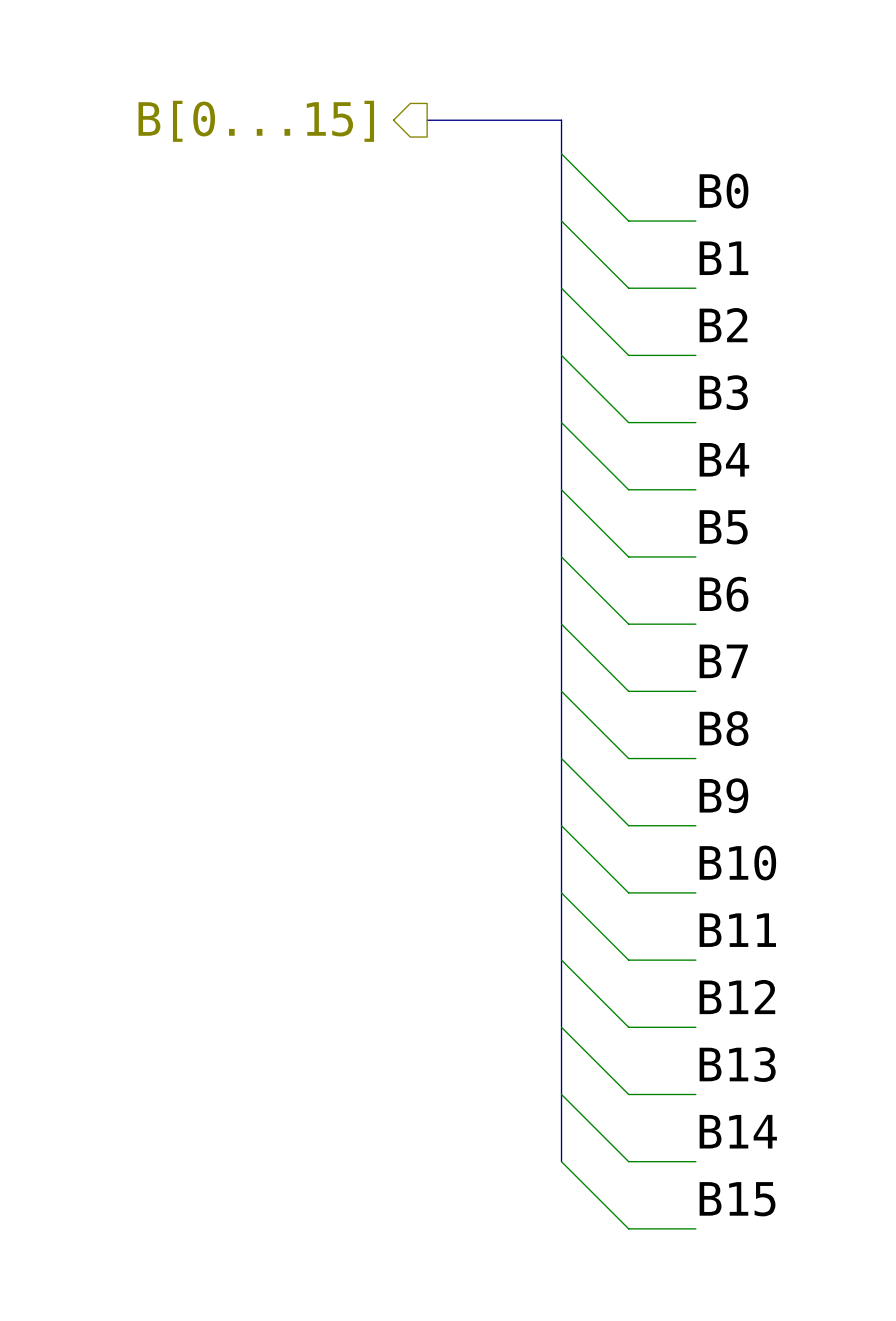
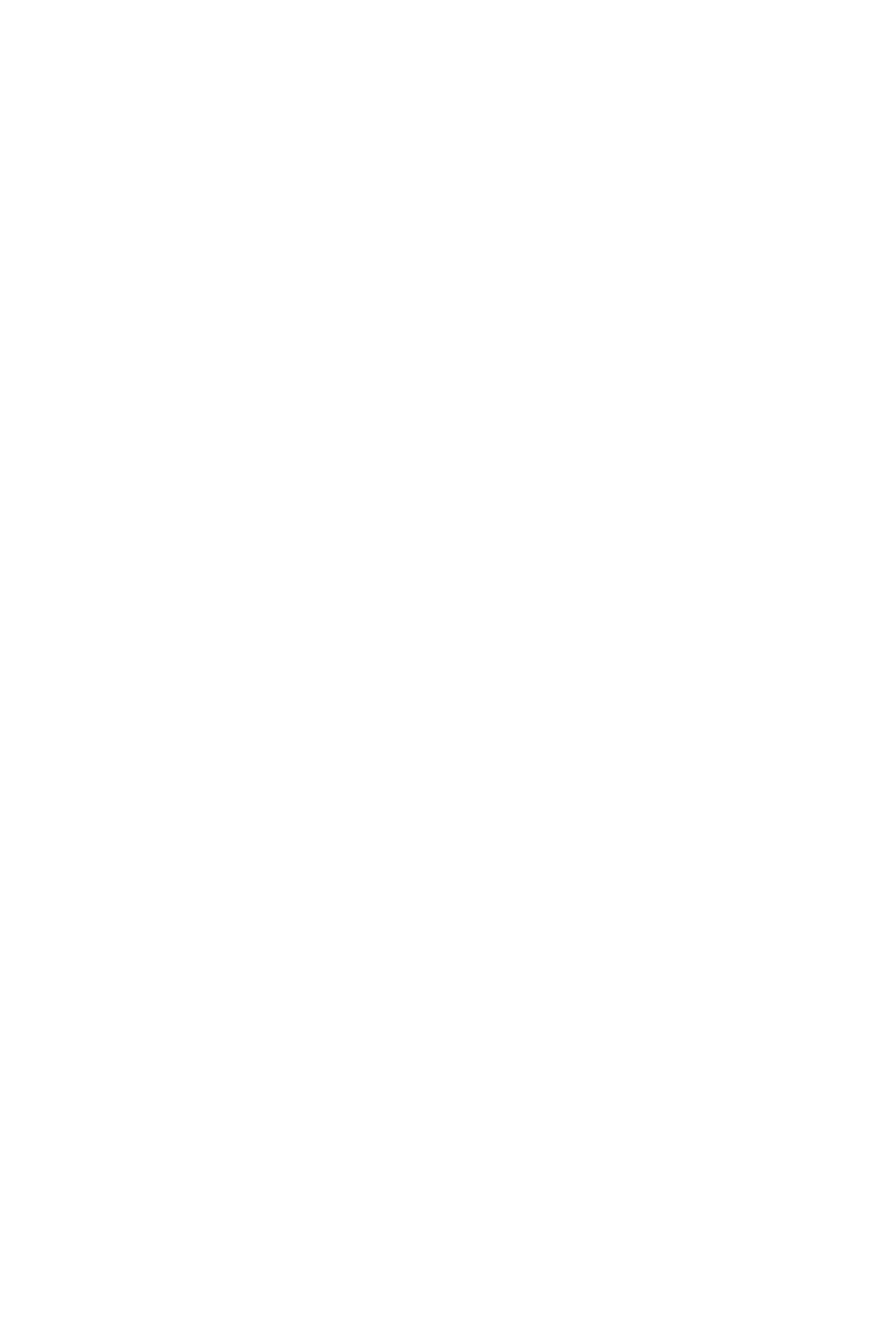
bus: (427, 120) (561, 120) (561, 1161) -> none
hierarchical label: B[0...15] (256, 121) -> none
wire: (561, 153) (628, 221) (695, 221) -> none
label: B0 (724, 191) -> none
wire: (561, 221) (628, 288) (695, 288) -> none
label: B1 (723, 258) -> none
wire: (561, 288) (628, 355) (695, 355) -> none
label: B2 (723, 325) -> none
wire: (561, 355) (628, 422) (695, 422) -> none
label: B3 (723, 392) -> none
wire: (561, 422) (628, 489) (695, 489) -> none
label: B4 (724, 459) -> none
wire: (561, 489) (628, 556) (695, 556) -> none
label: B5 (723, 527) -> none
wire: (561, 556) (628, 624) (695, 624) -> none
label: B6 (724, 594) -> none
wire: (561, 624) (628, 691) (695, 691) -> none
label: B7 (723, 661) -> none
wire: (561, 691) (628, 758) (695, 758) -> none
label: B8 (724, 728) -> none
wire: (561, 758) (628, 825) (695, 825) -> none
label: B9 (723, 795) -> none
wire: (561, 825) (628, 892) (695, 892) -> none
label: B10 (737, 862) -> none
wire: (561, 892) (628, 960) (695, 960) -> none
label: B11 (737, 930) -> none
wire: (561, 960) (628, 1027) (695, 1027) -> none
label: B12 (737, 997) -> none
wire: (561, 1027) (628, 1094) (695, 1094) -> none
label: B13 (737, 1064) -> none
wire: (561, 1094) (628, 1161) (695, 1161) -> none
label: B14 (738, 1131) -> none
wire: (561, 1161) (628, 1228) (695, 1228) -> none
label: B15 (737, 1199) -> none

